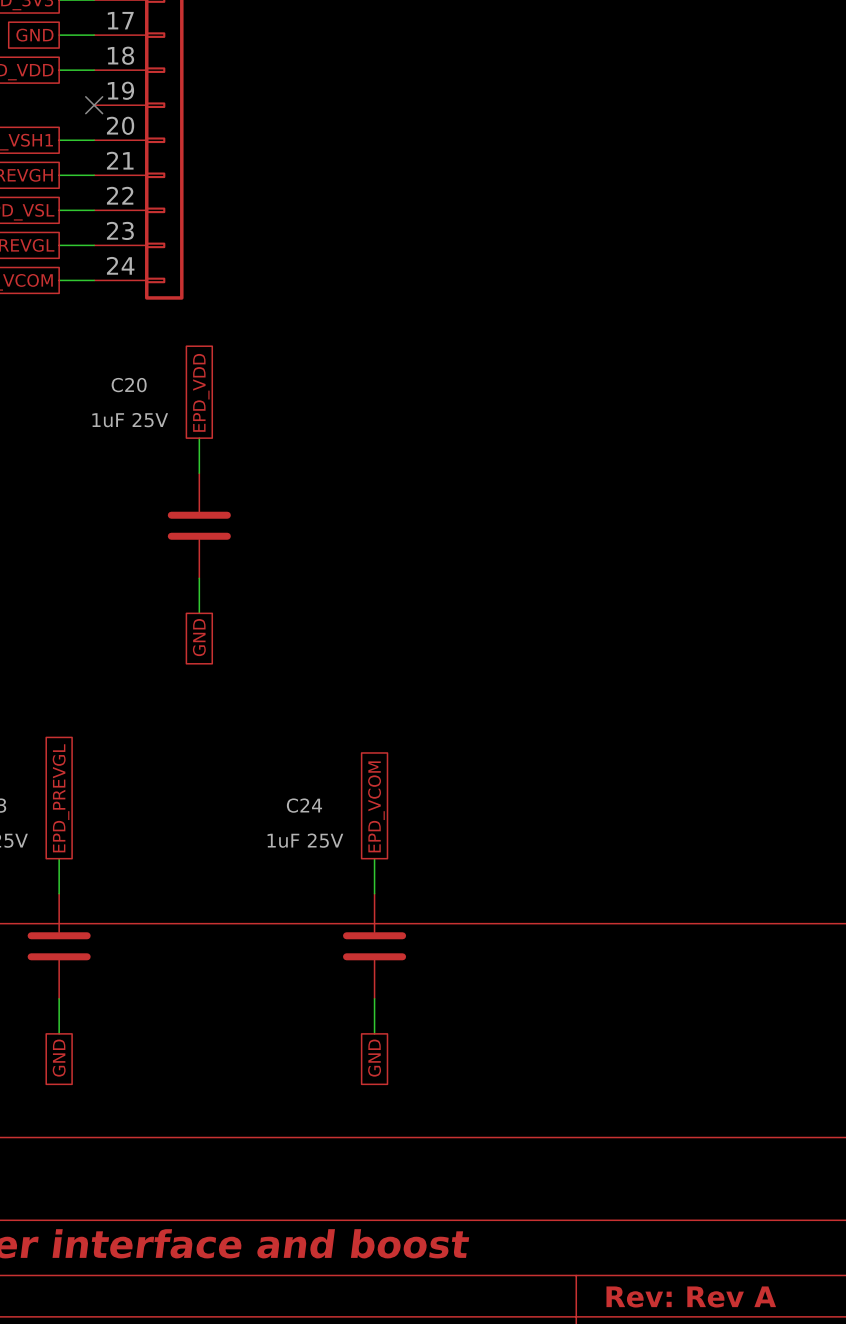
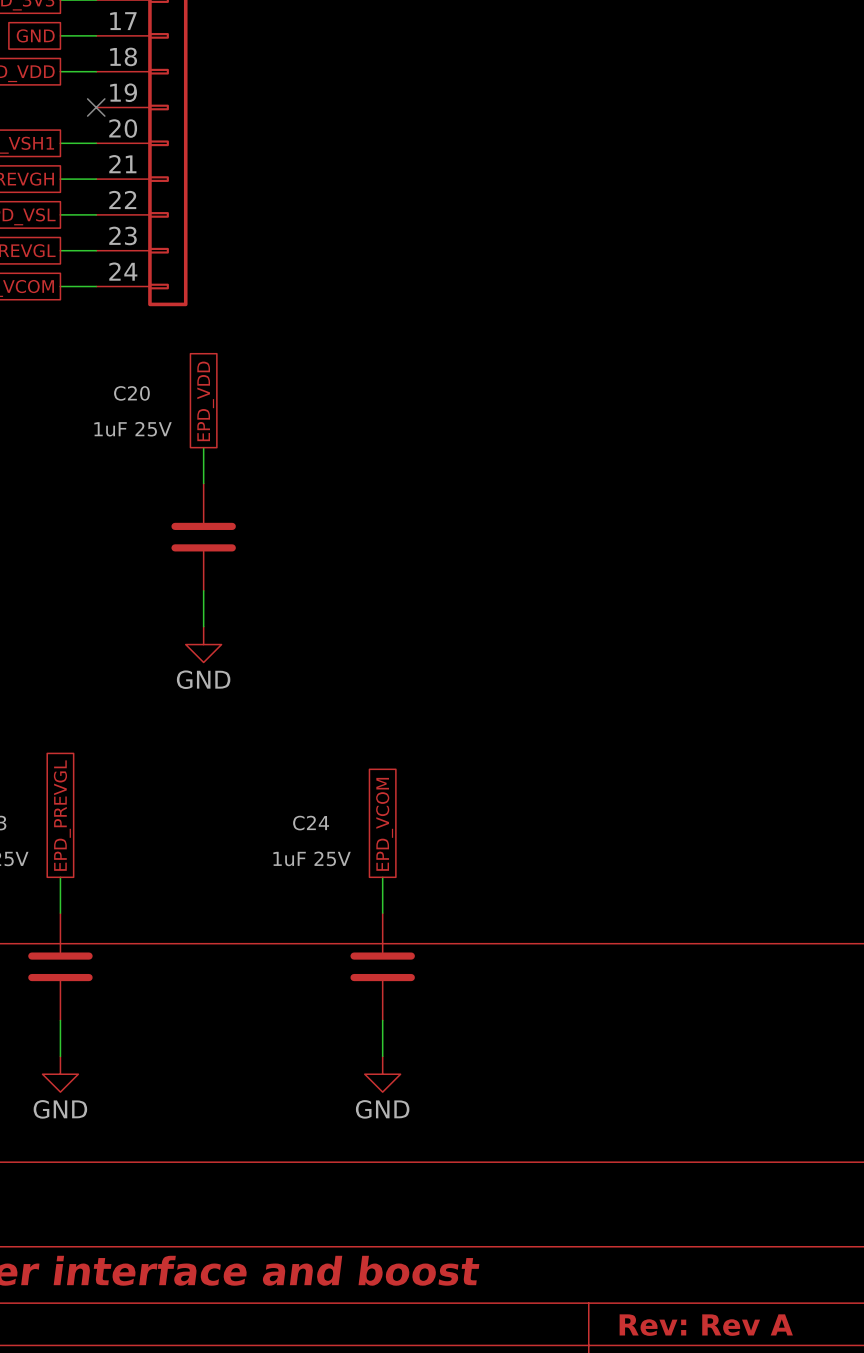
power symbol: none -> GND (203, 644)
global label: GND (199, 637) -> none
power symbol: none -> GND (60, 1074)
power symbol: none -> GND (382, 1074)
global label: GND (59, 1058) -> none
global label: GND (374, 1058) -> none

